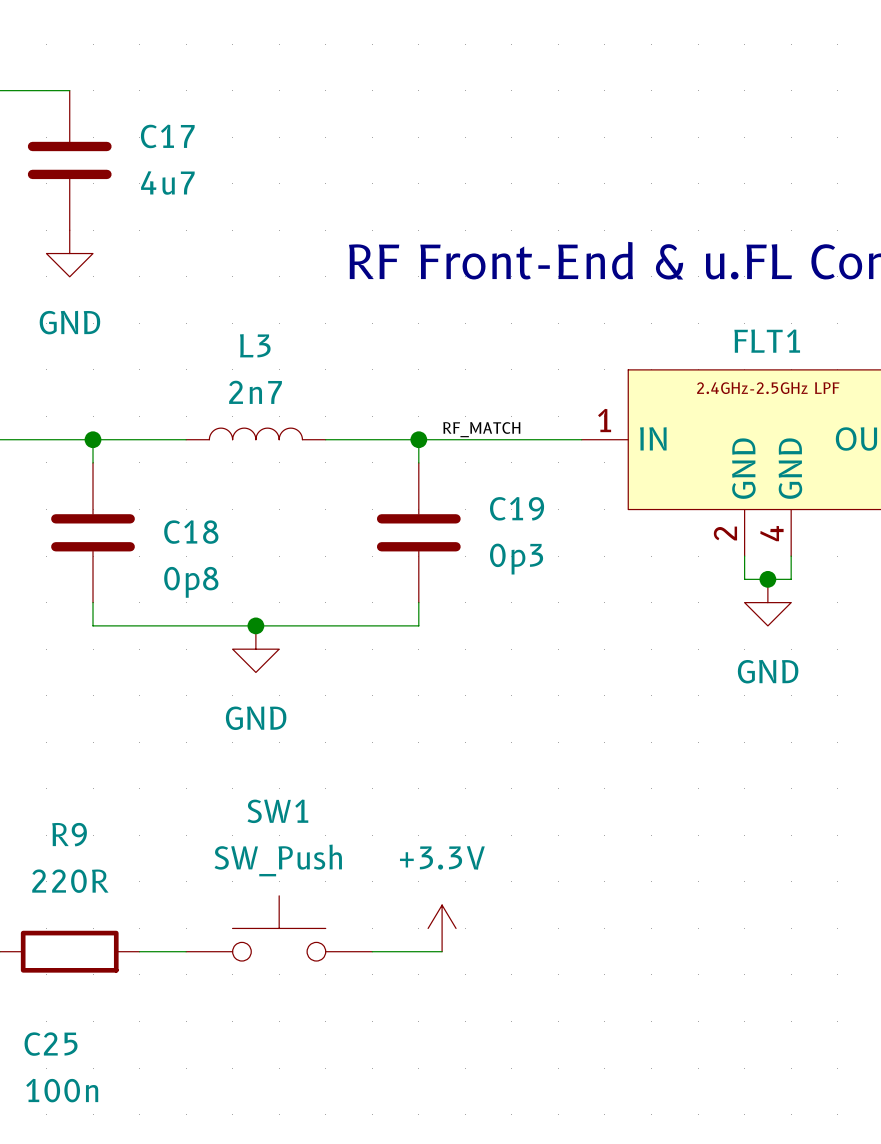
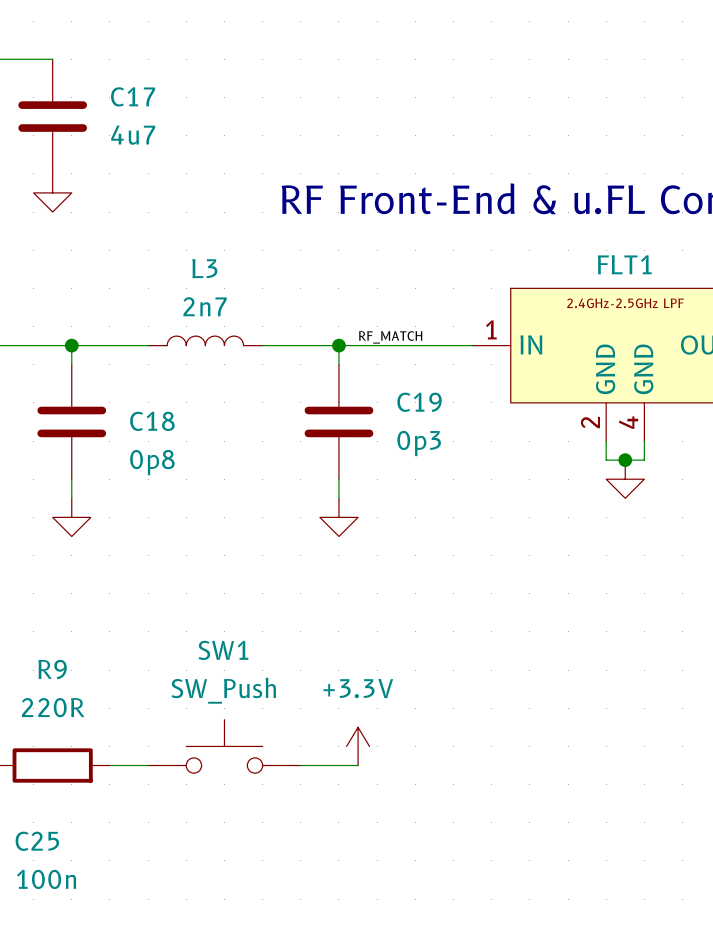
power symbol text: GND (69, 322) -> none
wire: (93, 625) (418, 625) -> none
junction: (255, 625) -> none
power symbol: none -> (71, 517)
power symbol: GND (255, 649) -> none
power symbol: none -> (338, 517)
power symbol text: GND (768, 671) -> none

